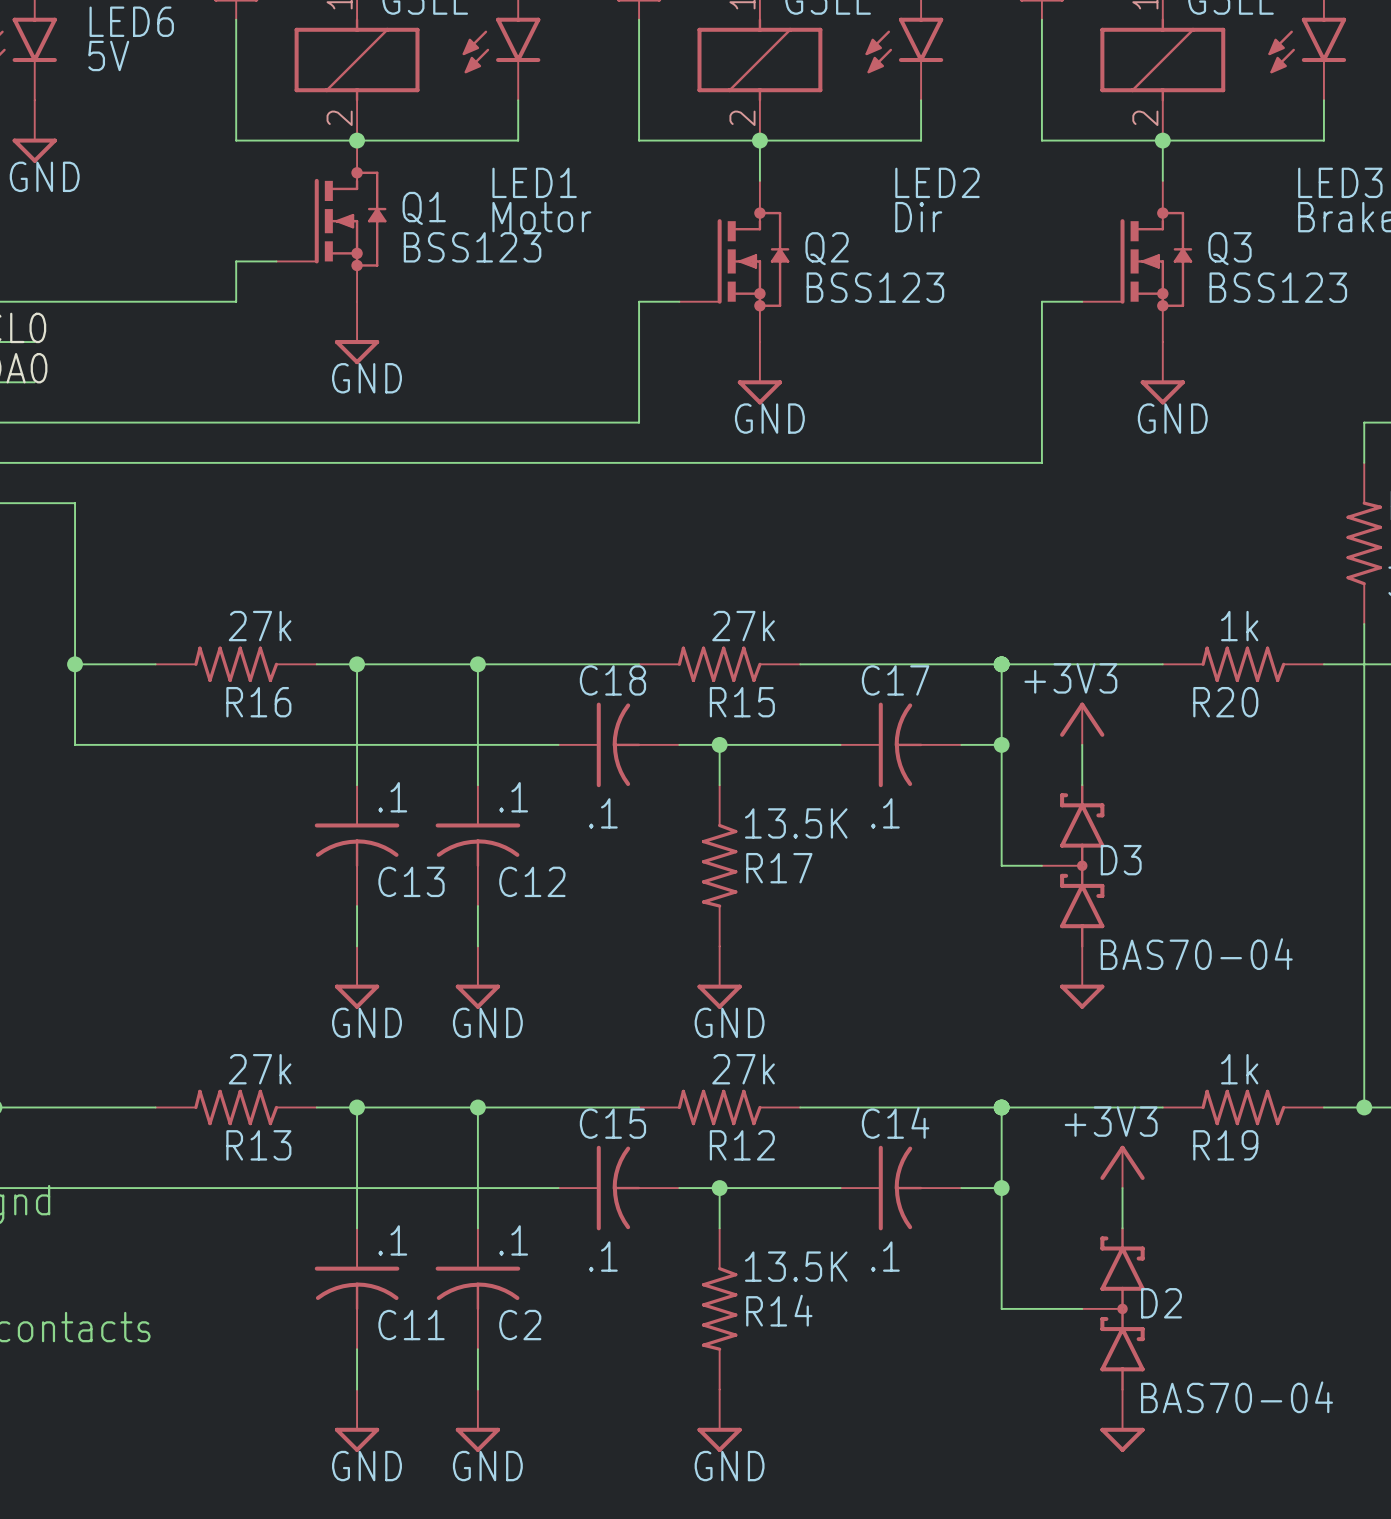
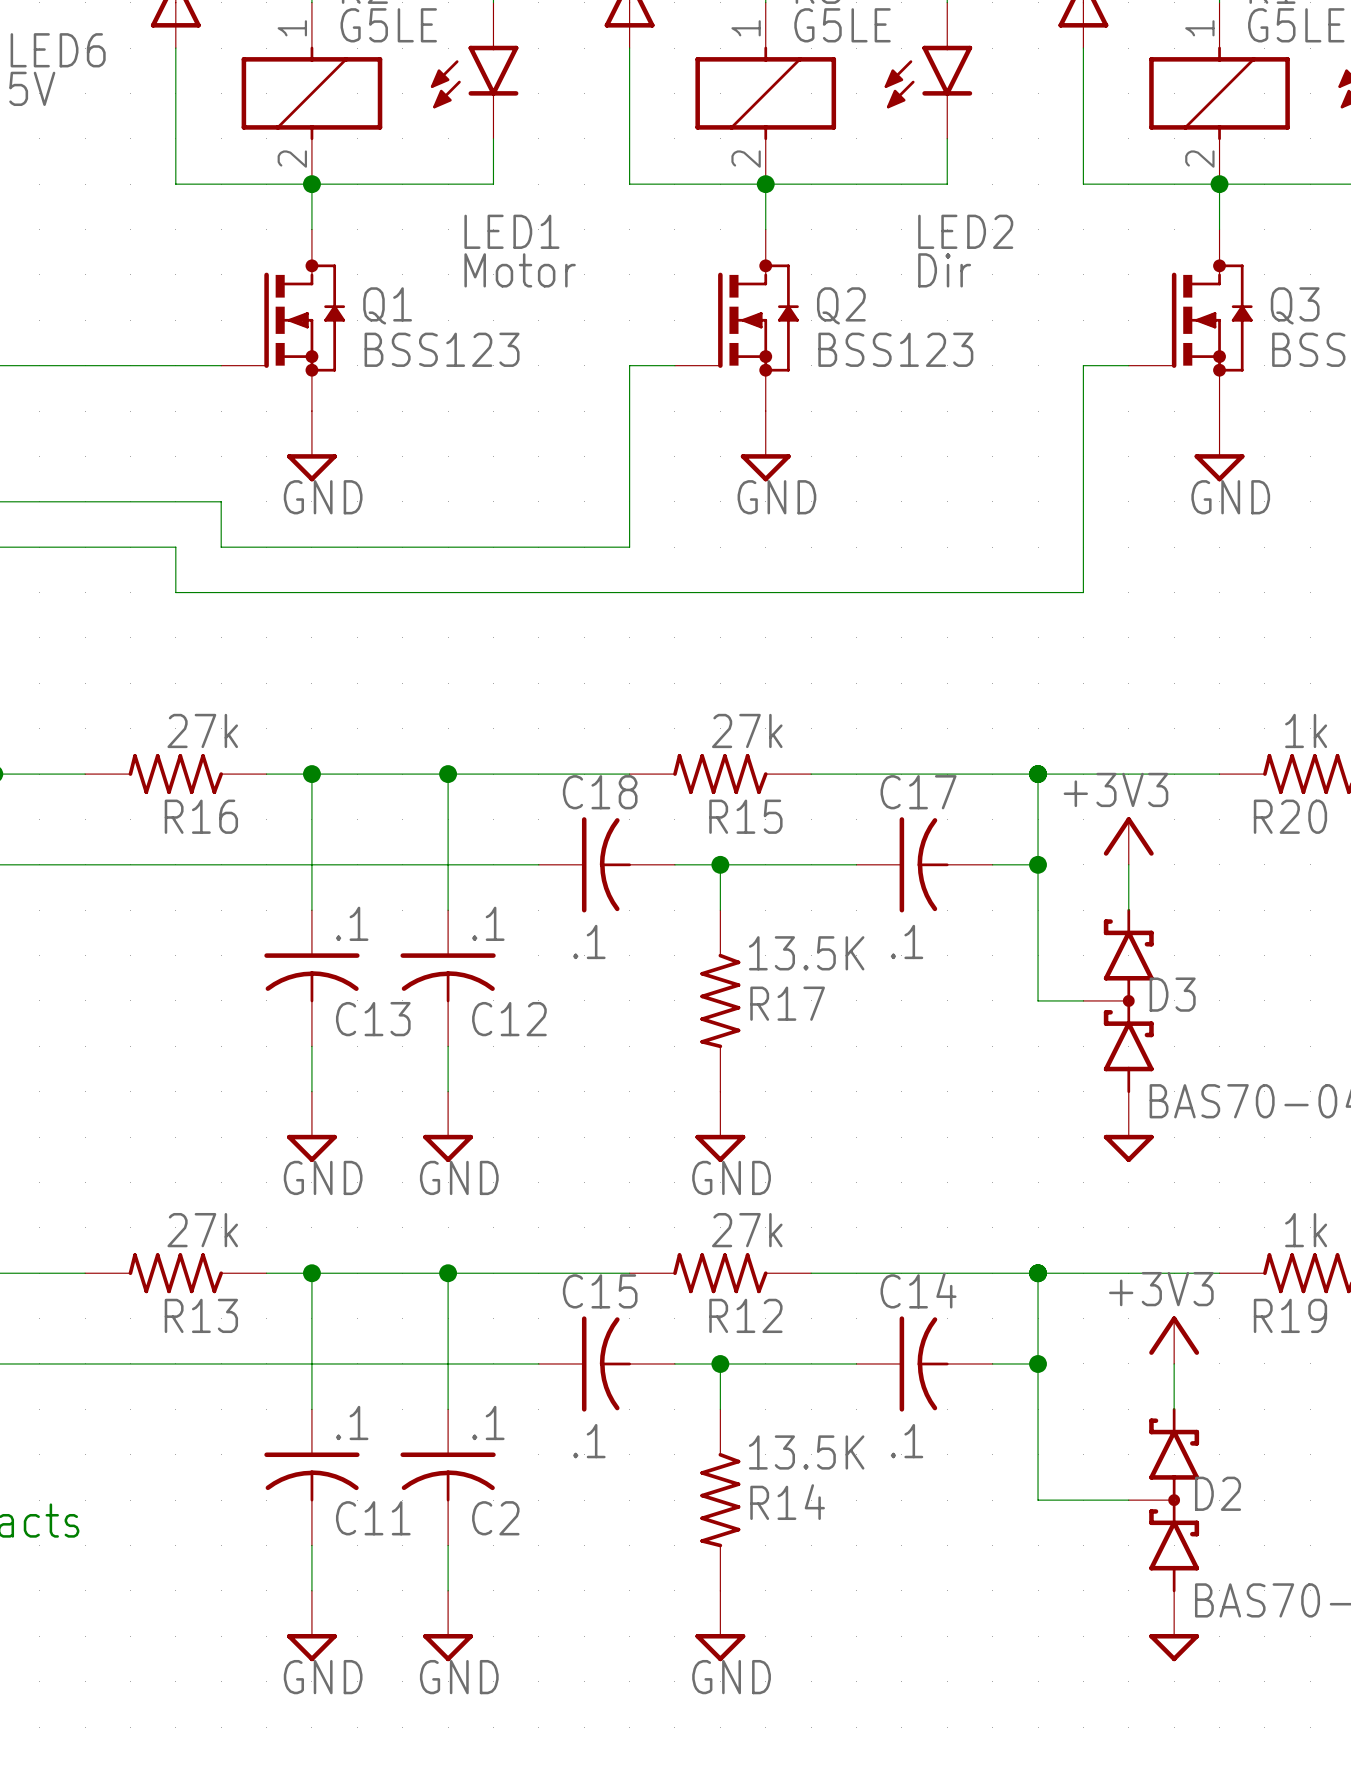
Q1 position: (331, 221) -> (283, 320)
wire: (276, 261) (236, 261) (236, 301) -> (221, 365) (175, 365)
power symbol position: GND (357, 332) -> GND (311, 446)
wire: (276, 422) (639, 422) -> (629, 547) (629, 501)
wire: (236, 462) (276, 462) -> (221, 501) (221, 547)
wire: (639, 462) (1041, 462) -> (175, 547) (175, 592) (1083, 592) (1083, 547)

